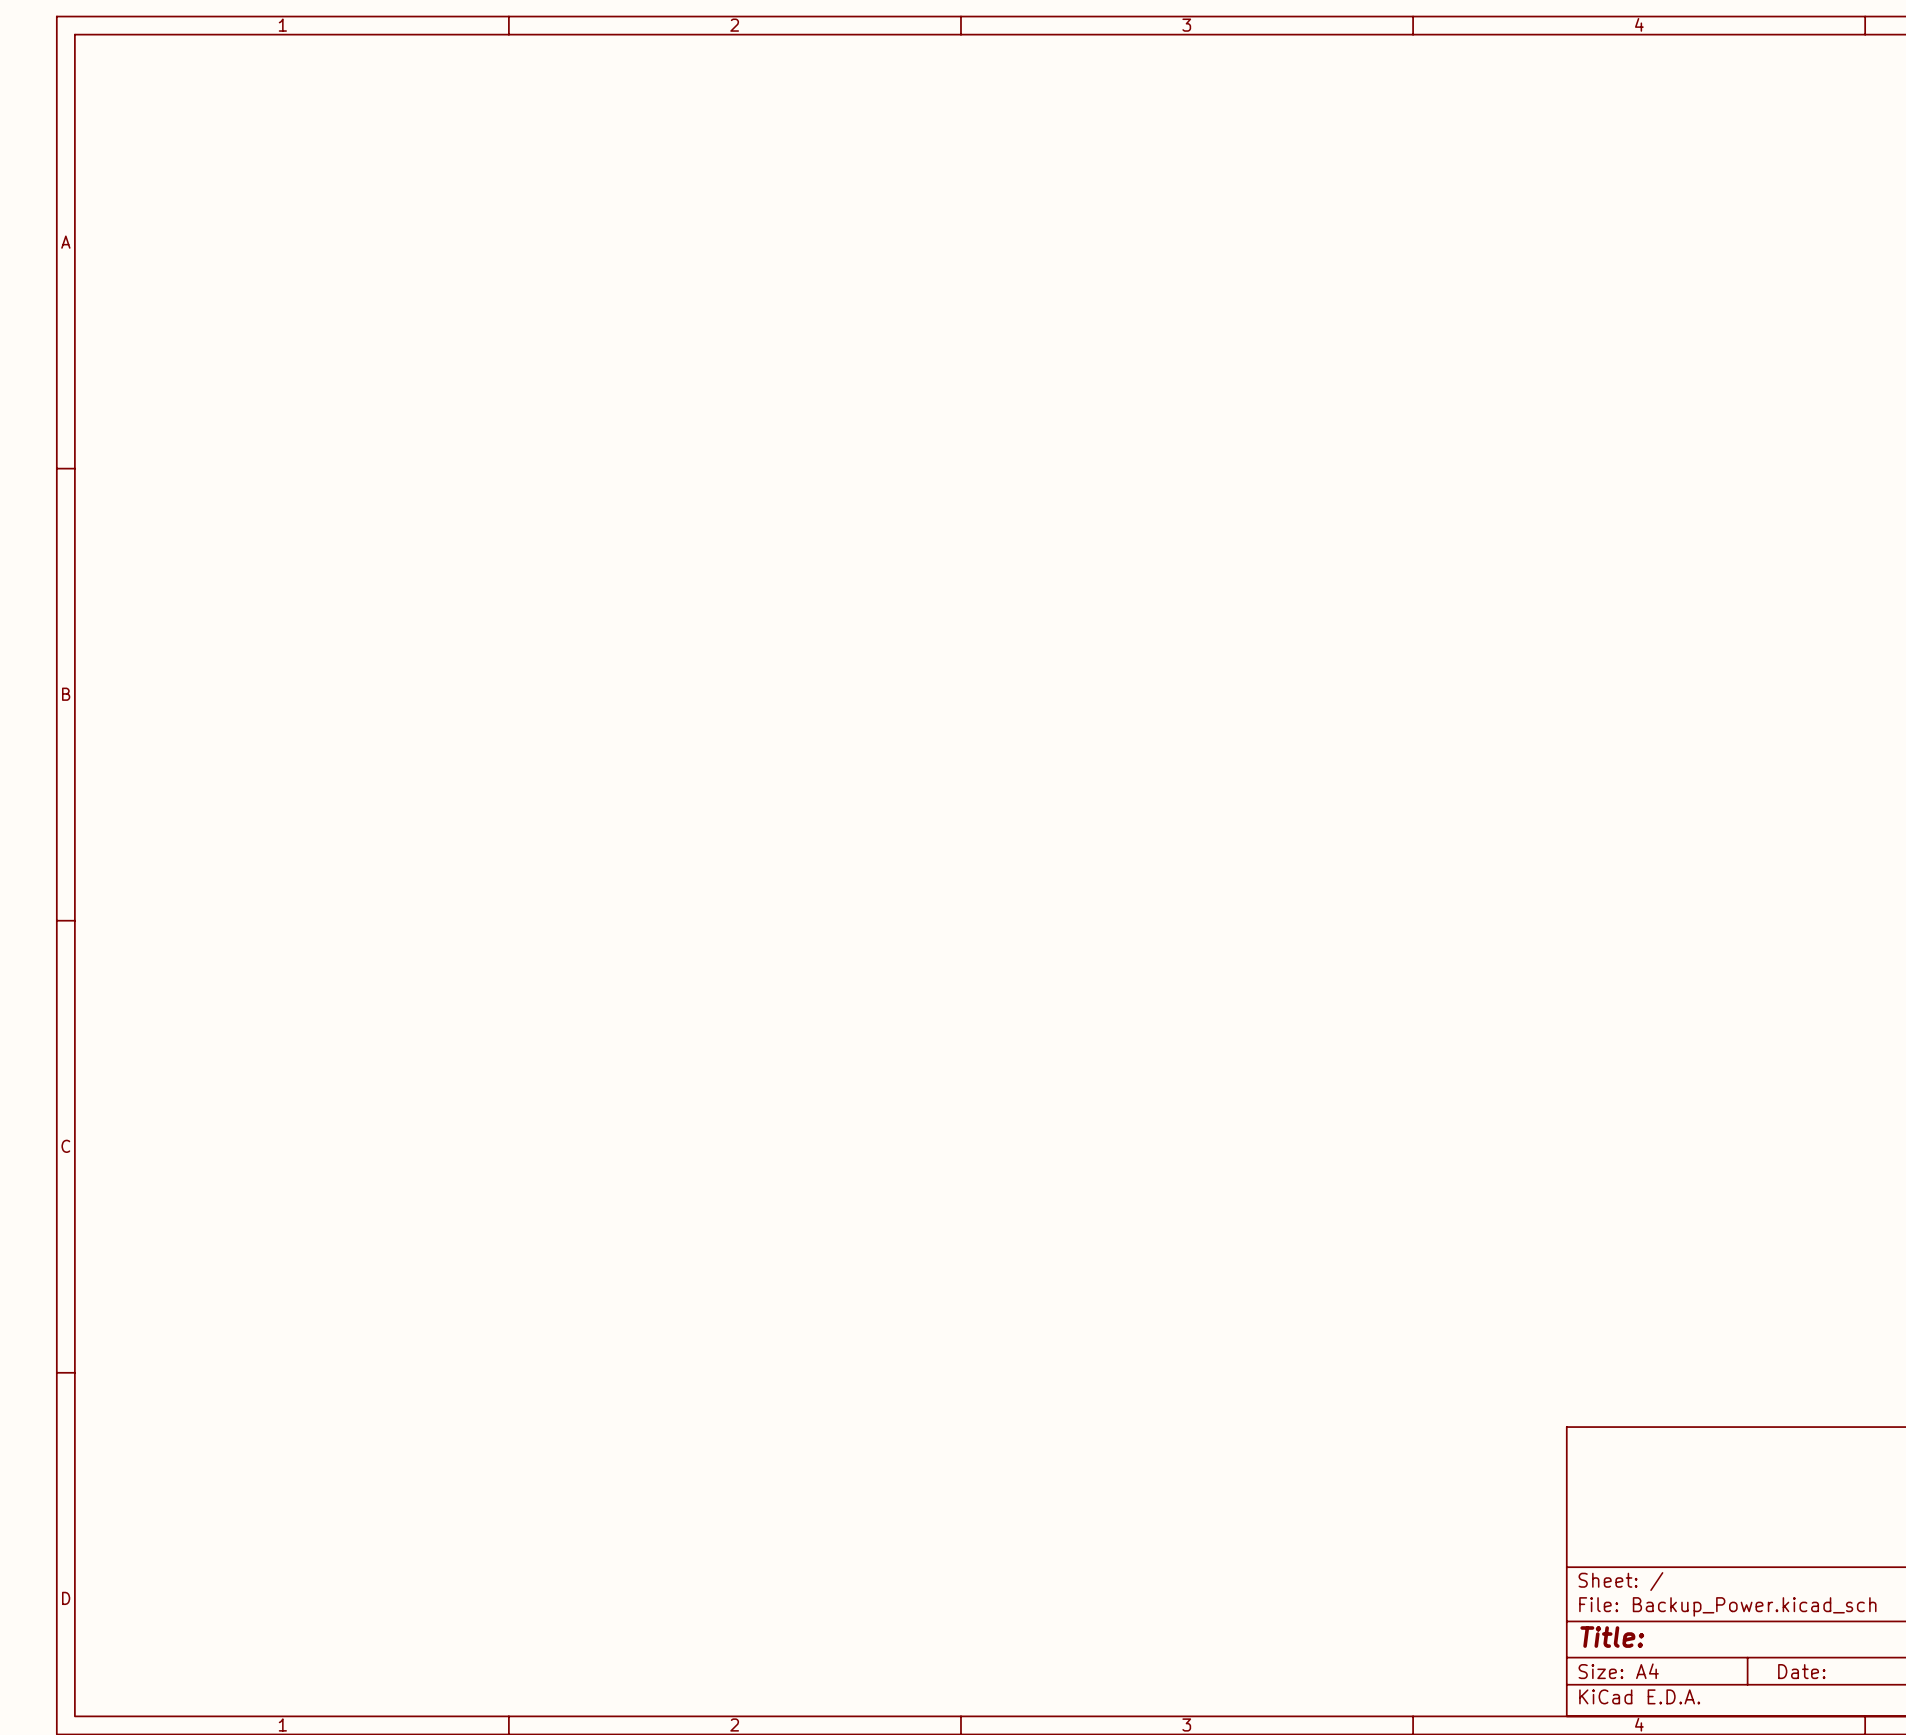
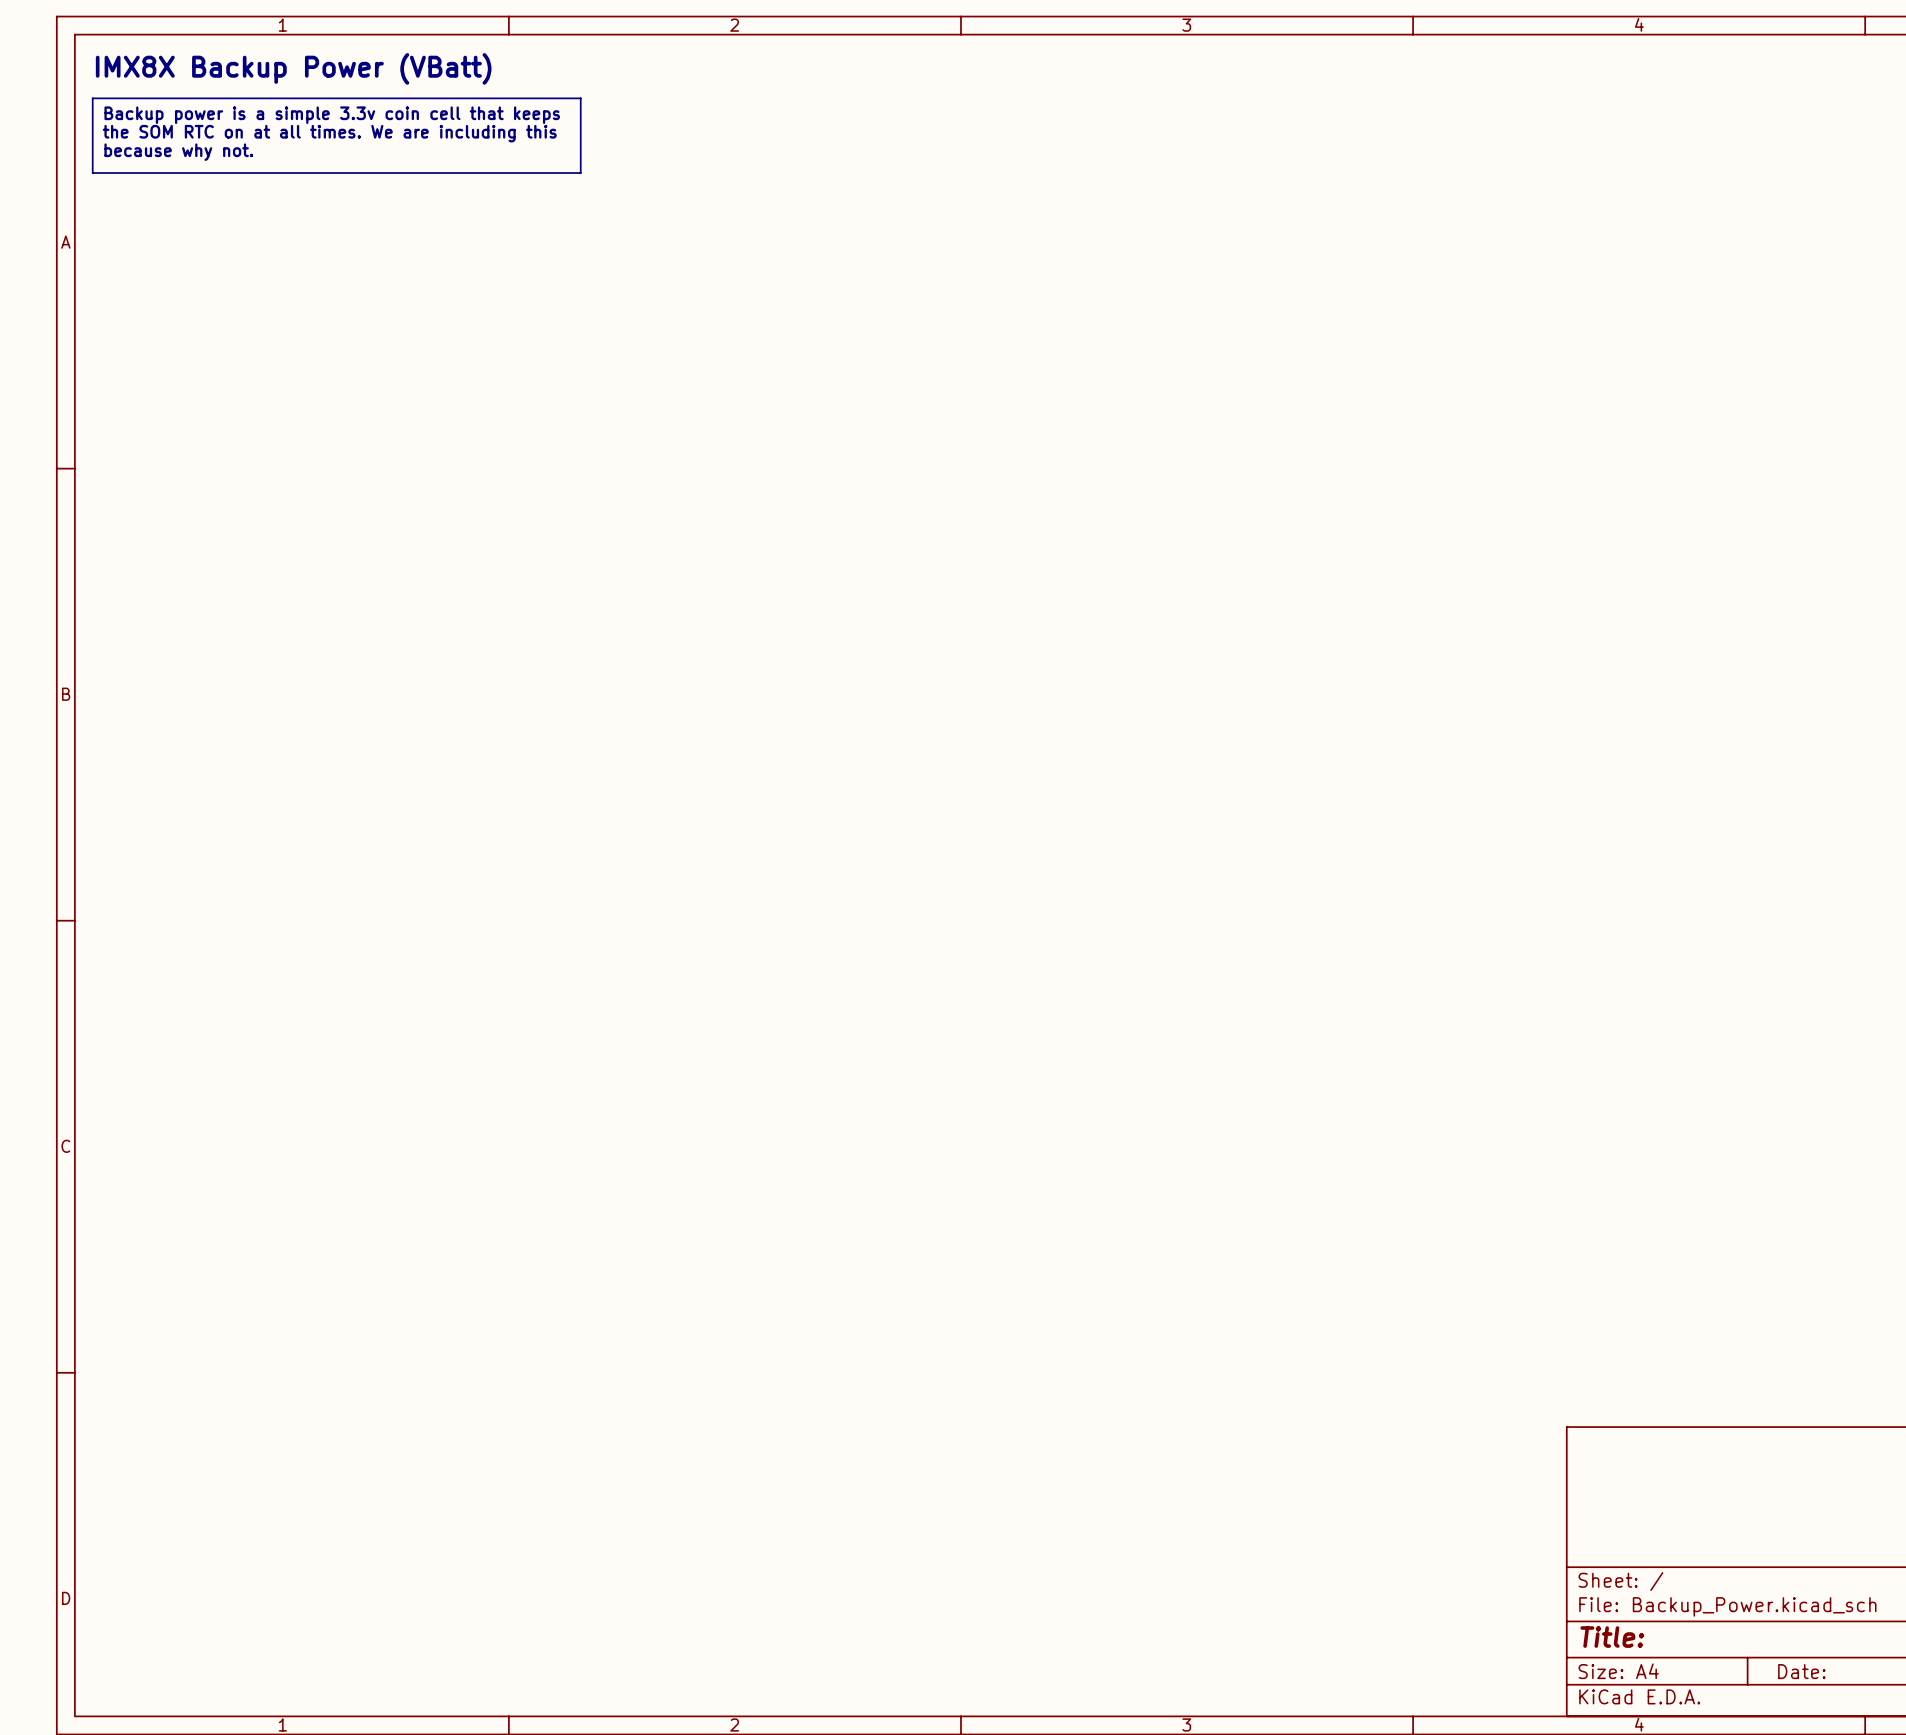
text: none -> IMX8X Backup Power (VBatt) (293, 68)
line: none -> (92, 98) (580, 98) (580, 173) (92, 173) (92, 98)
text: none -> Backup power is a simple 3.3v coin cell that keeps (332, 115)
text: none -> the SOM RTC on at all times. We are including this (329, 133)
text: none -> because why not. (178, 152)

